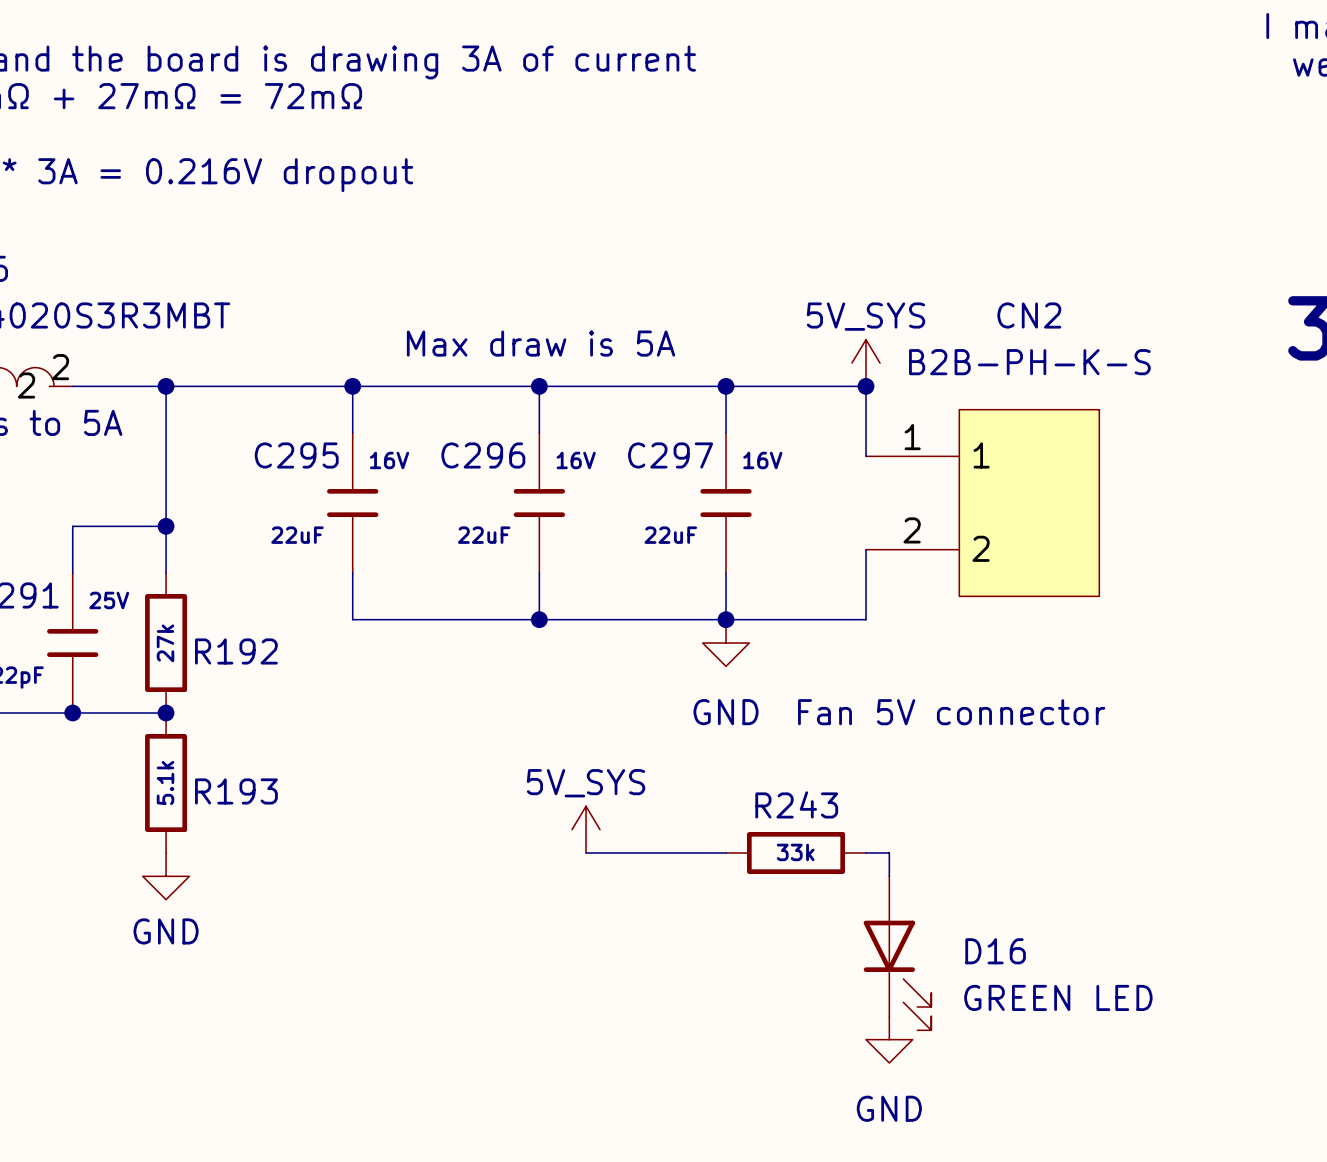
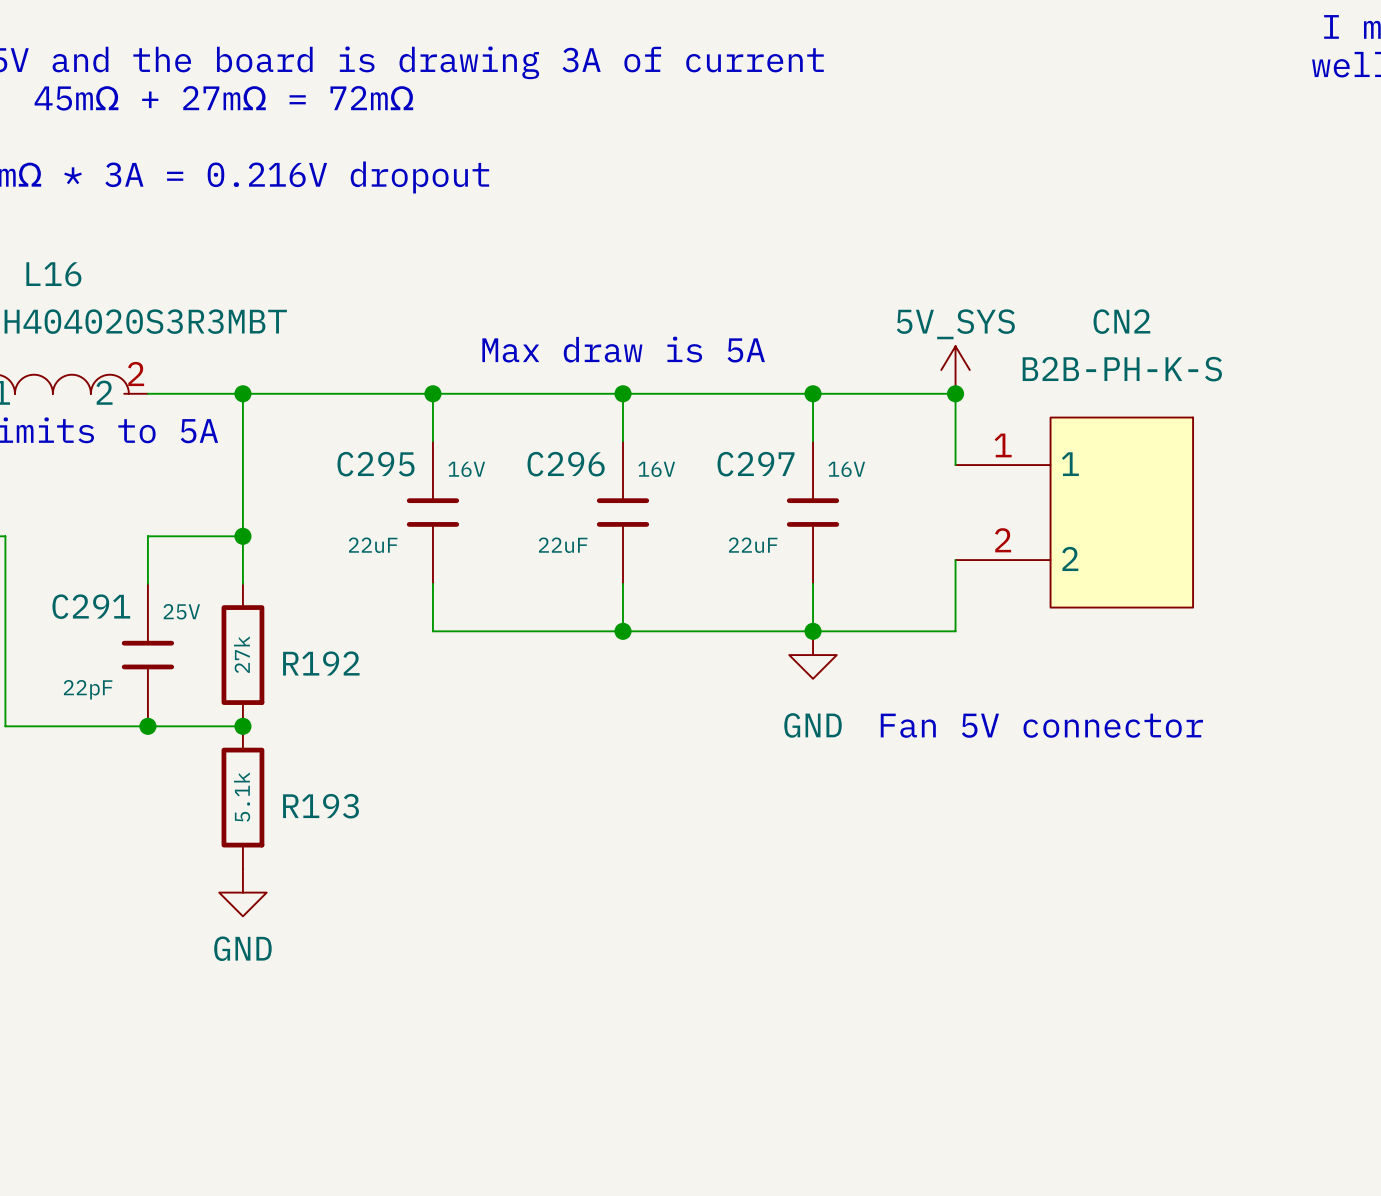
power symbol: 5V_SYS (586, 829) -> none
wire: (586, 852) (726, 852) -> none
R243: 33k (796, 852) -> none
wire: (866, 852) (889, 852) (889, 876) -> none
D16: GREEN LED (897, 953) -> none
power symbol: GND (889, 1039) -> none

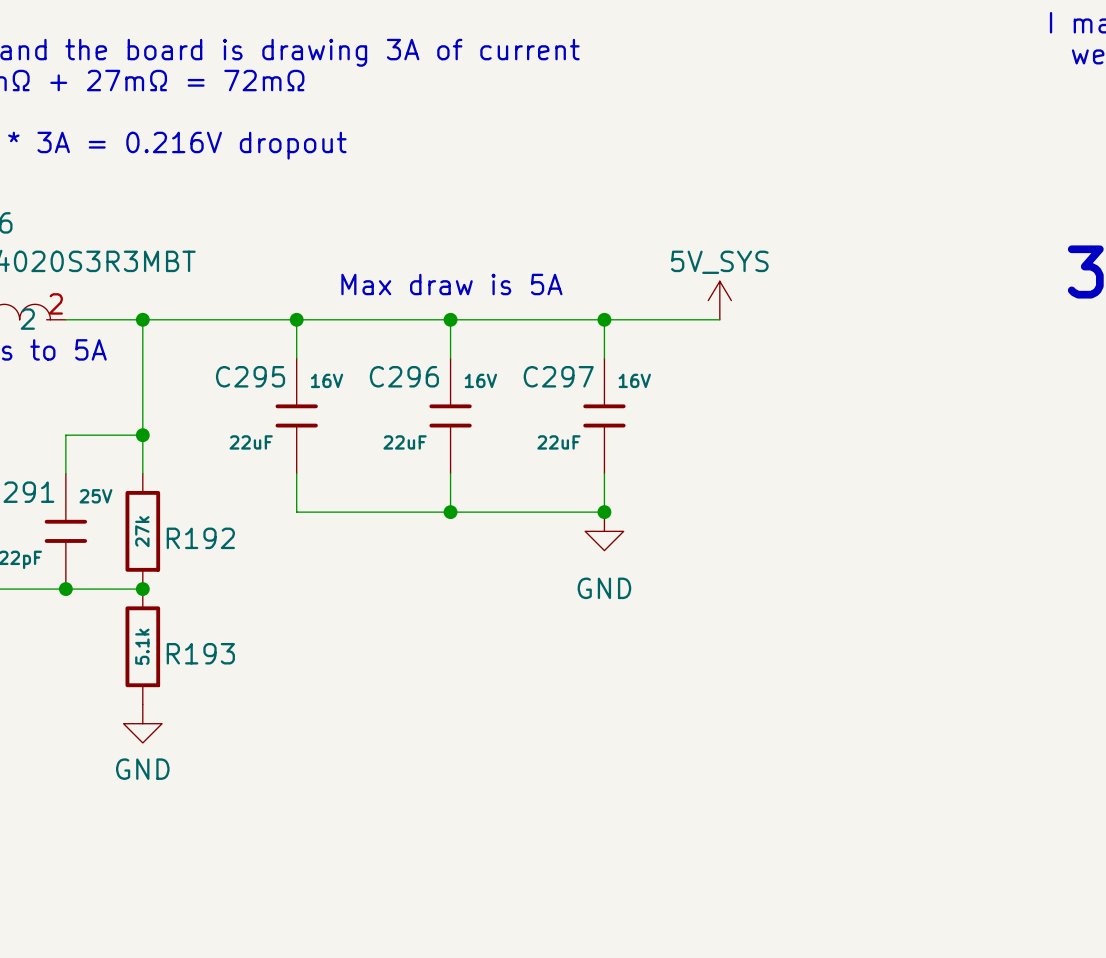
wire: (955, 393) (955, 465) -> none
junction: (955, 393) -> none
CN2: B2B-PH-K-S (1074, 512) -> none
wire: (955, 560) (955, 631) (813, 631) -> none
text: Fan 5V connector (1041, 725) -> none

